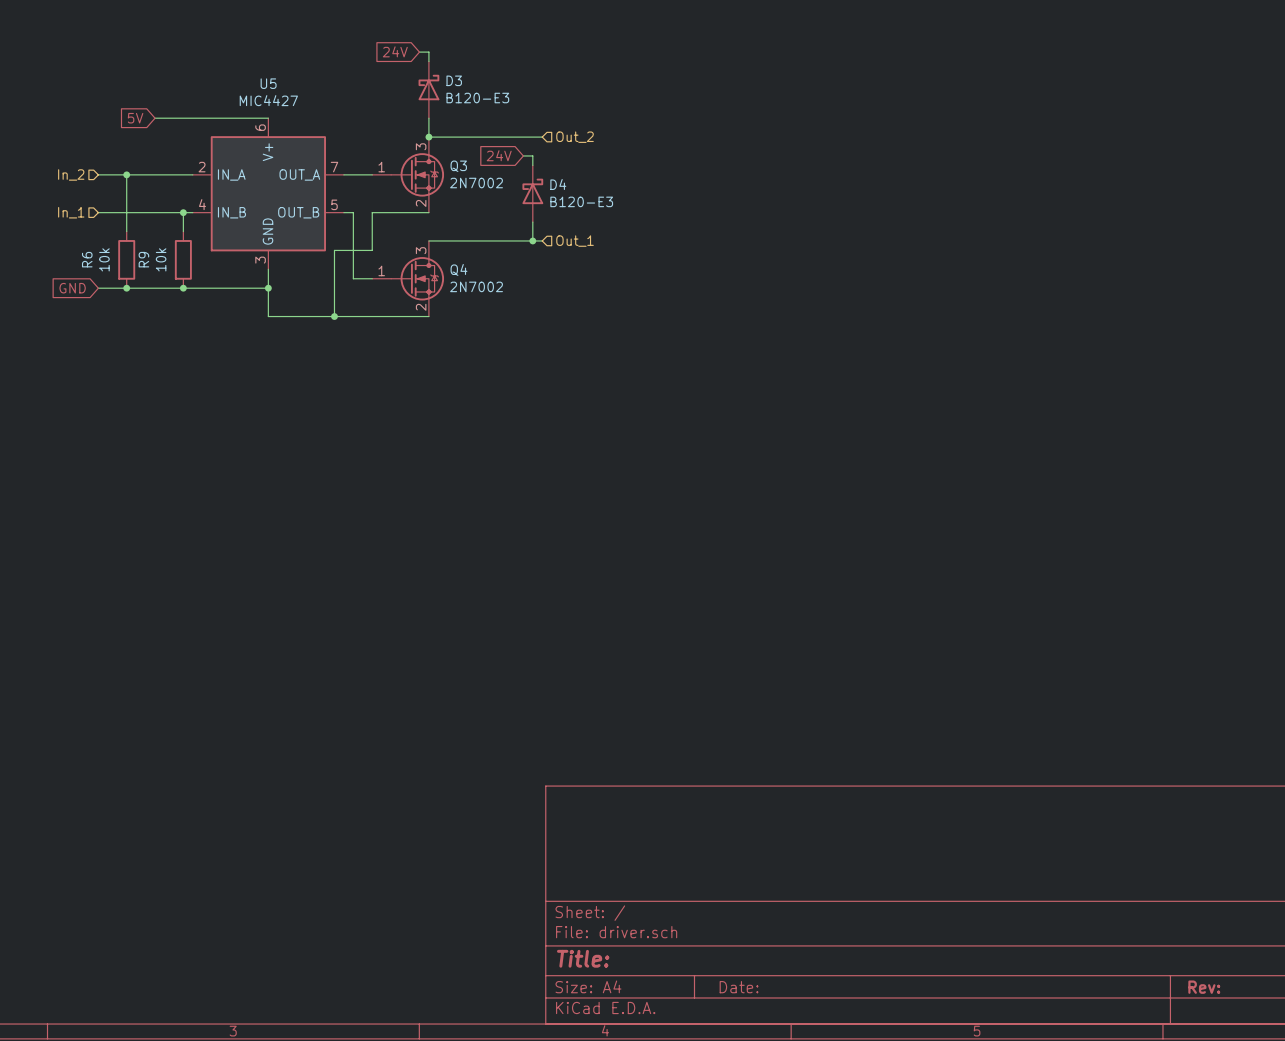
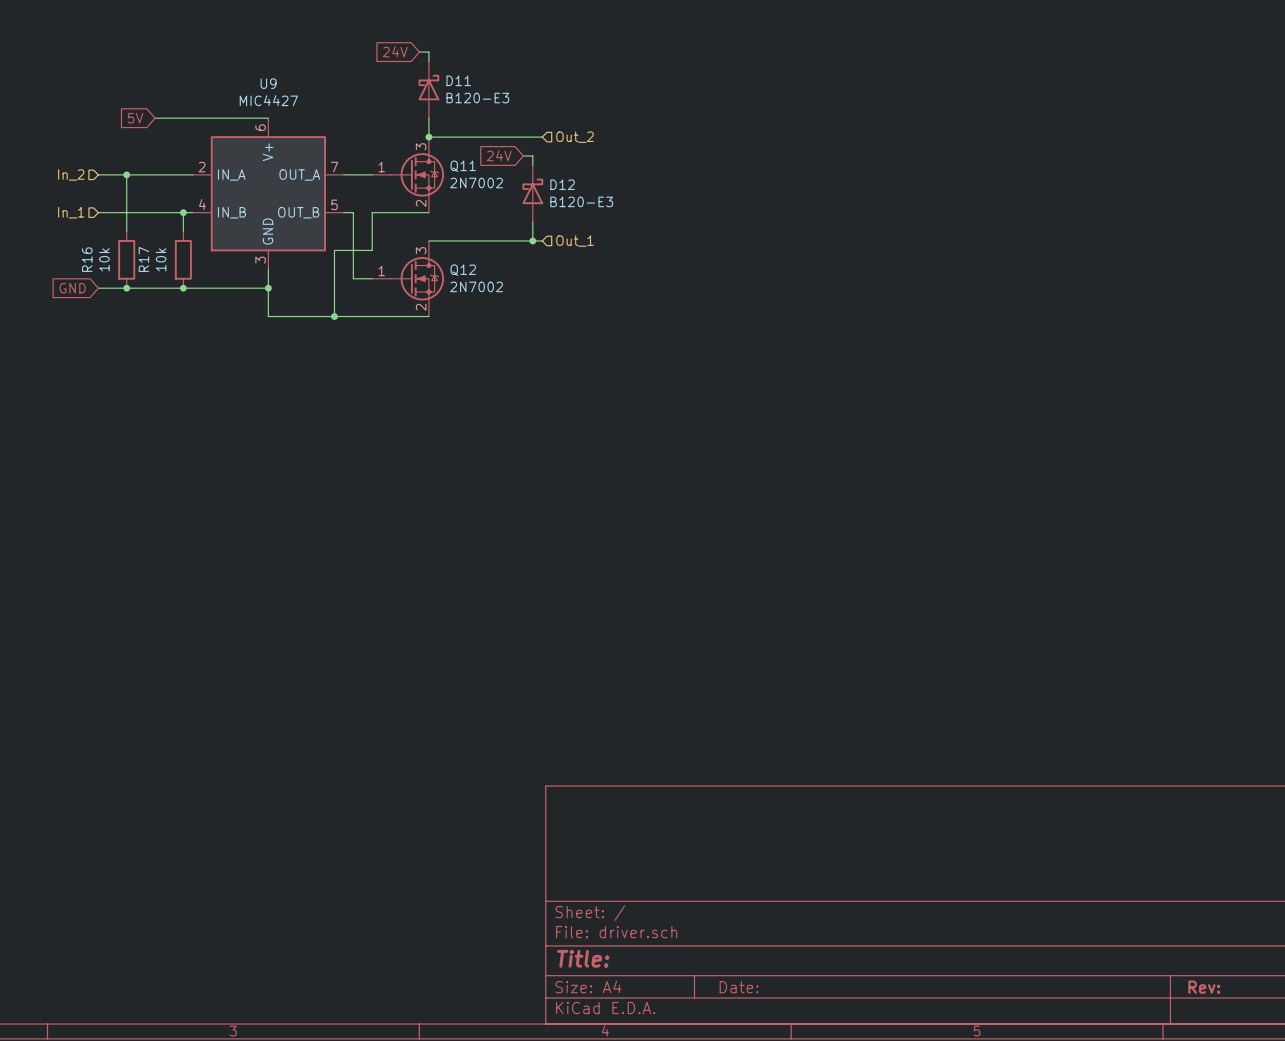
D3 name: D3 (454, 80) -> D11 (458, 80)
U5 name: U5 (268, 83) -> U9 (268, 83)
Q3 name: Q3 (458, 166) -> Q11 (463, 166)
D4 name: D4 (558, 184) -> D12 (562, 184)
R6 name: R6 (87, 259) -> R16 (87, 259)
R9 name: R9 (143, 259) -> R17 (143, 259)
Q4 name: Q4 (458, 269) -> Q12 (463, 270)

